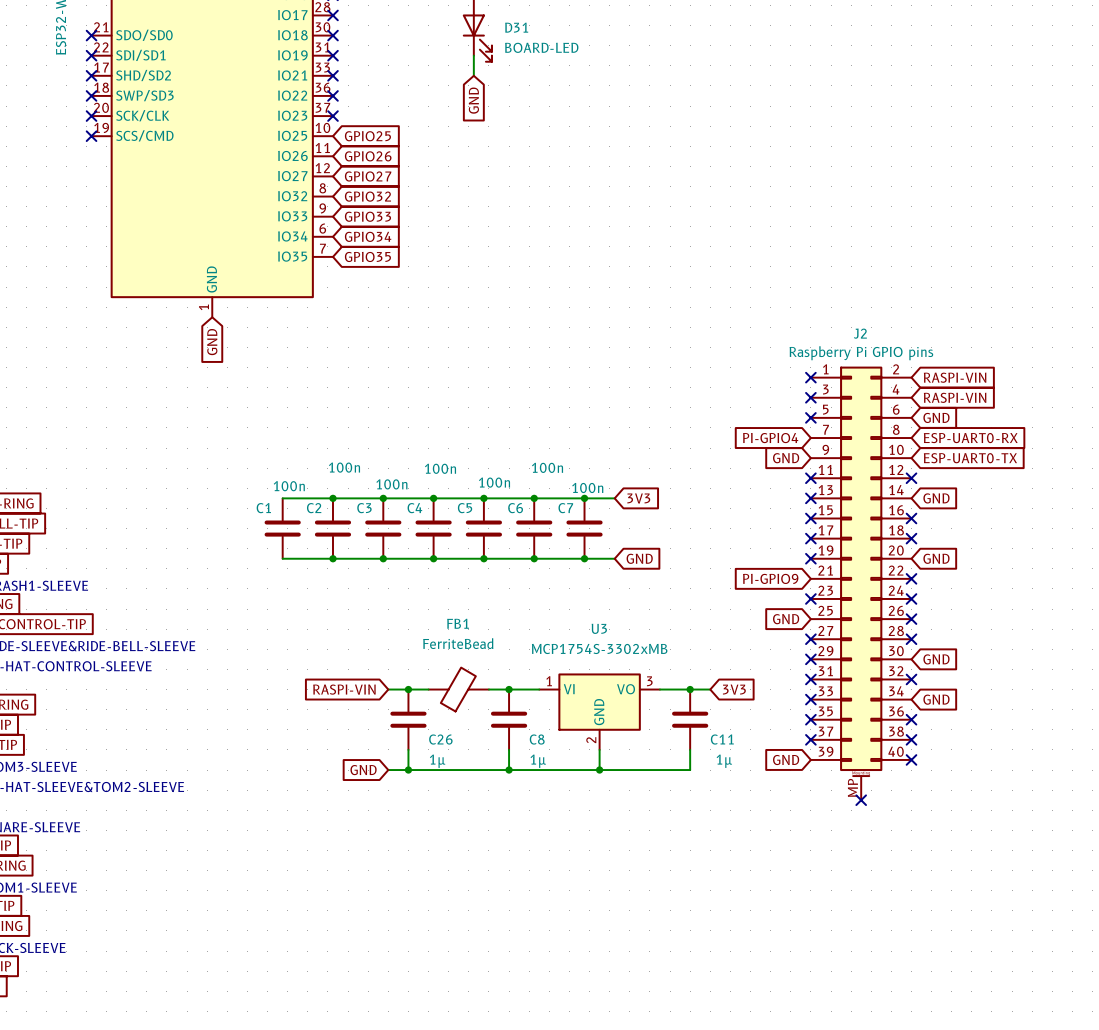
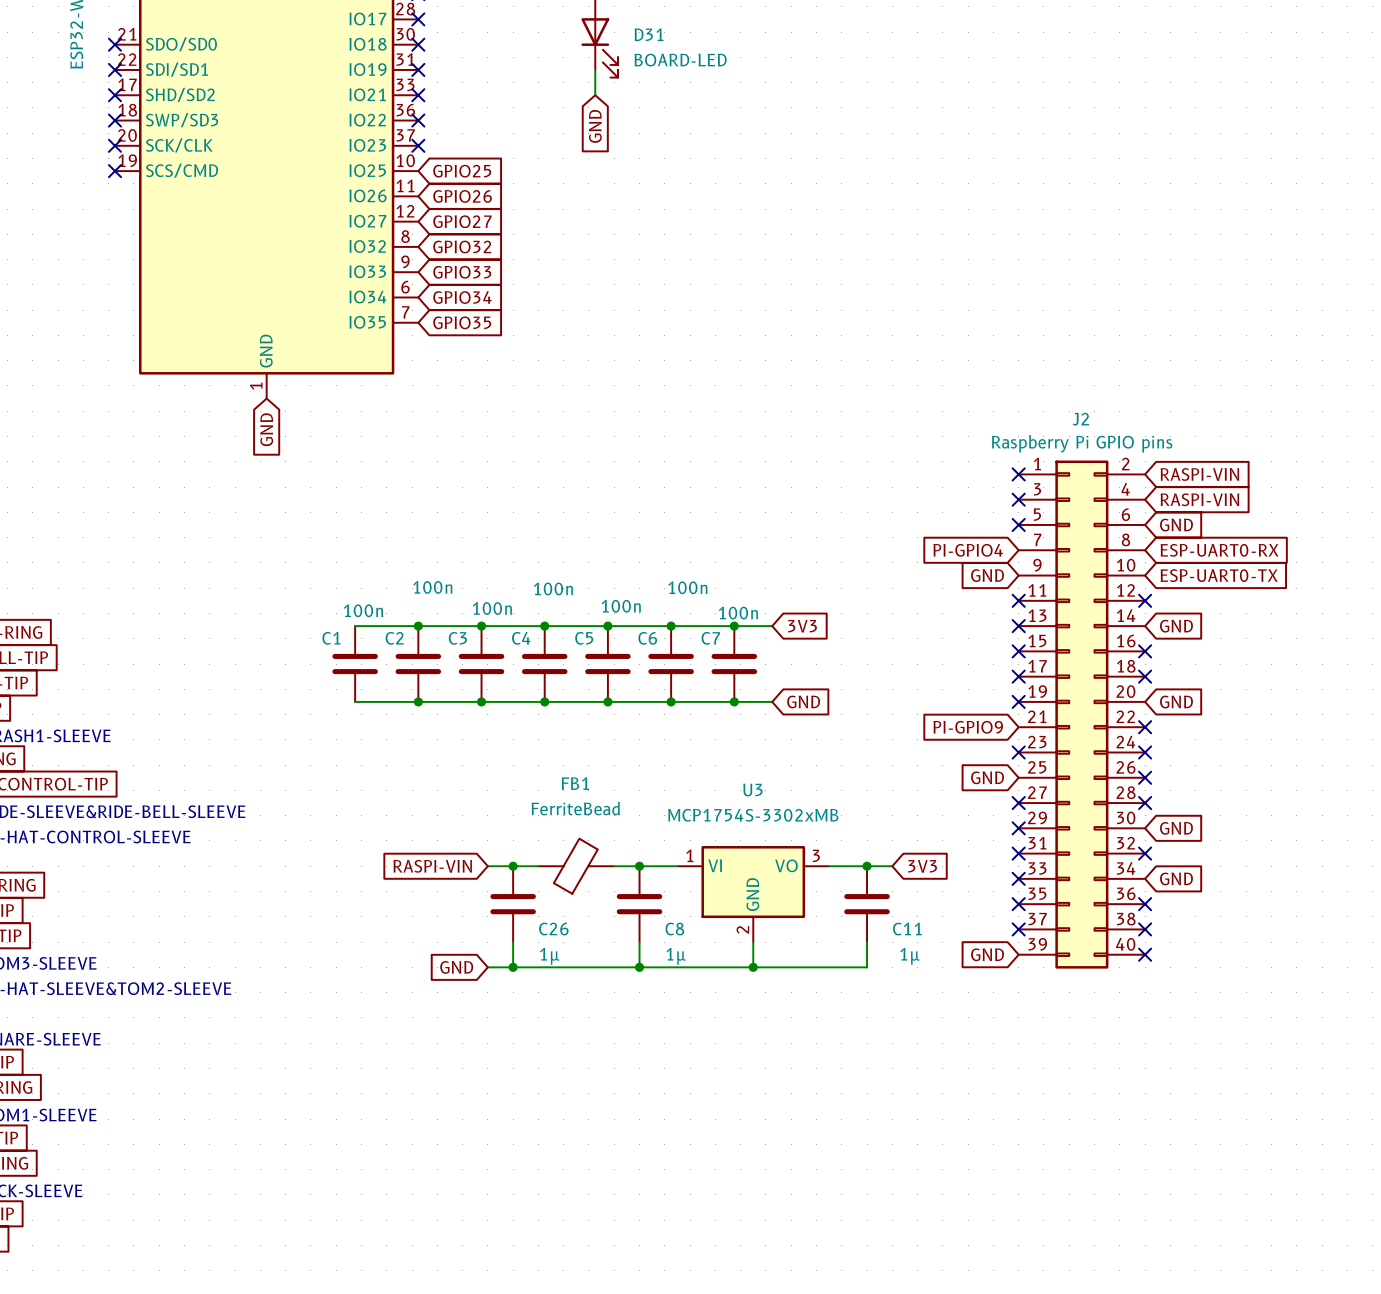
J2 symbol: [810, 366, 912, 801] -> [1018, 460, 1146, 969]
no-connect mark: (861, 800) -> none

